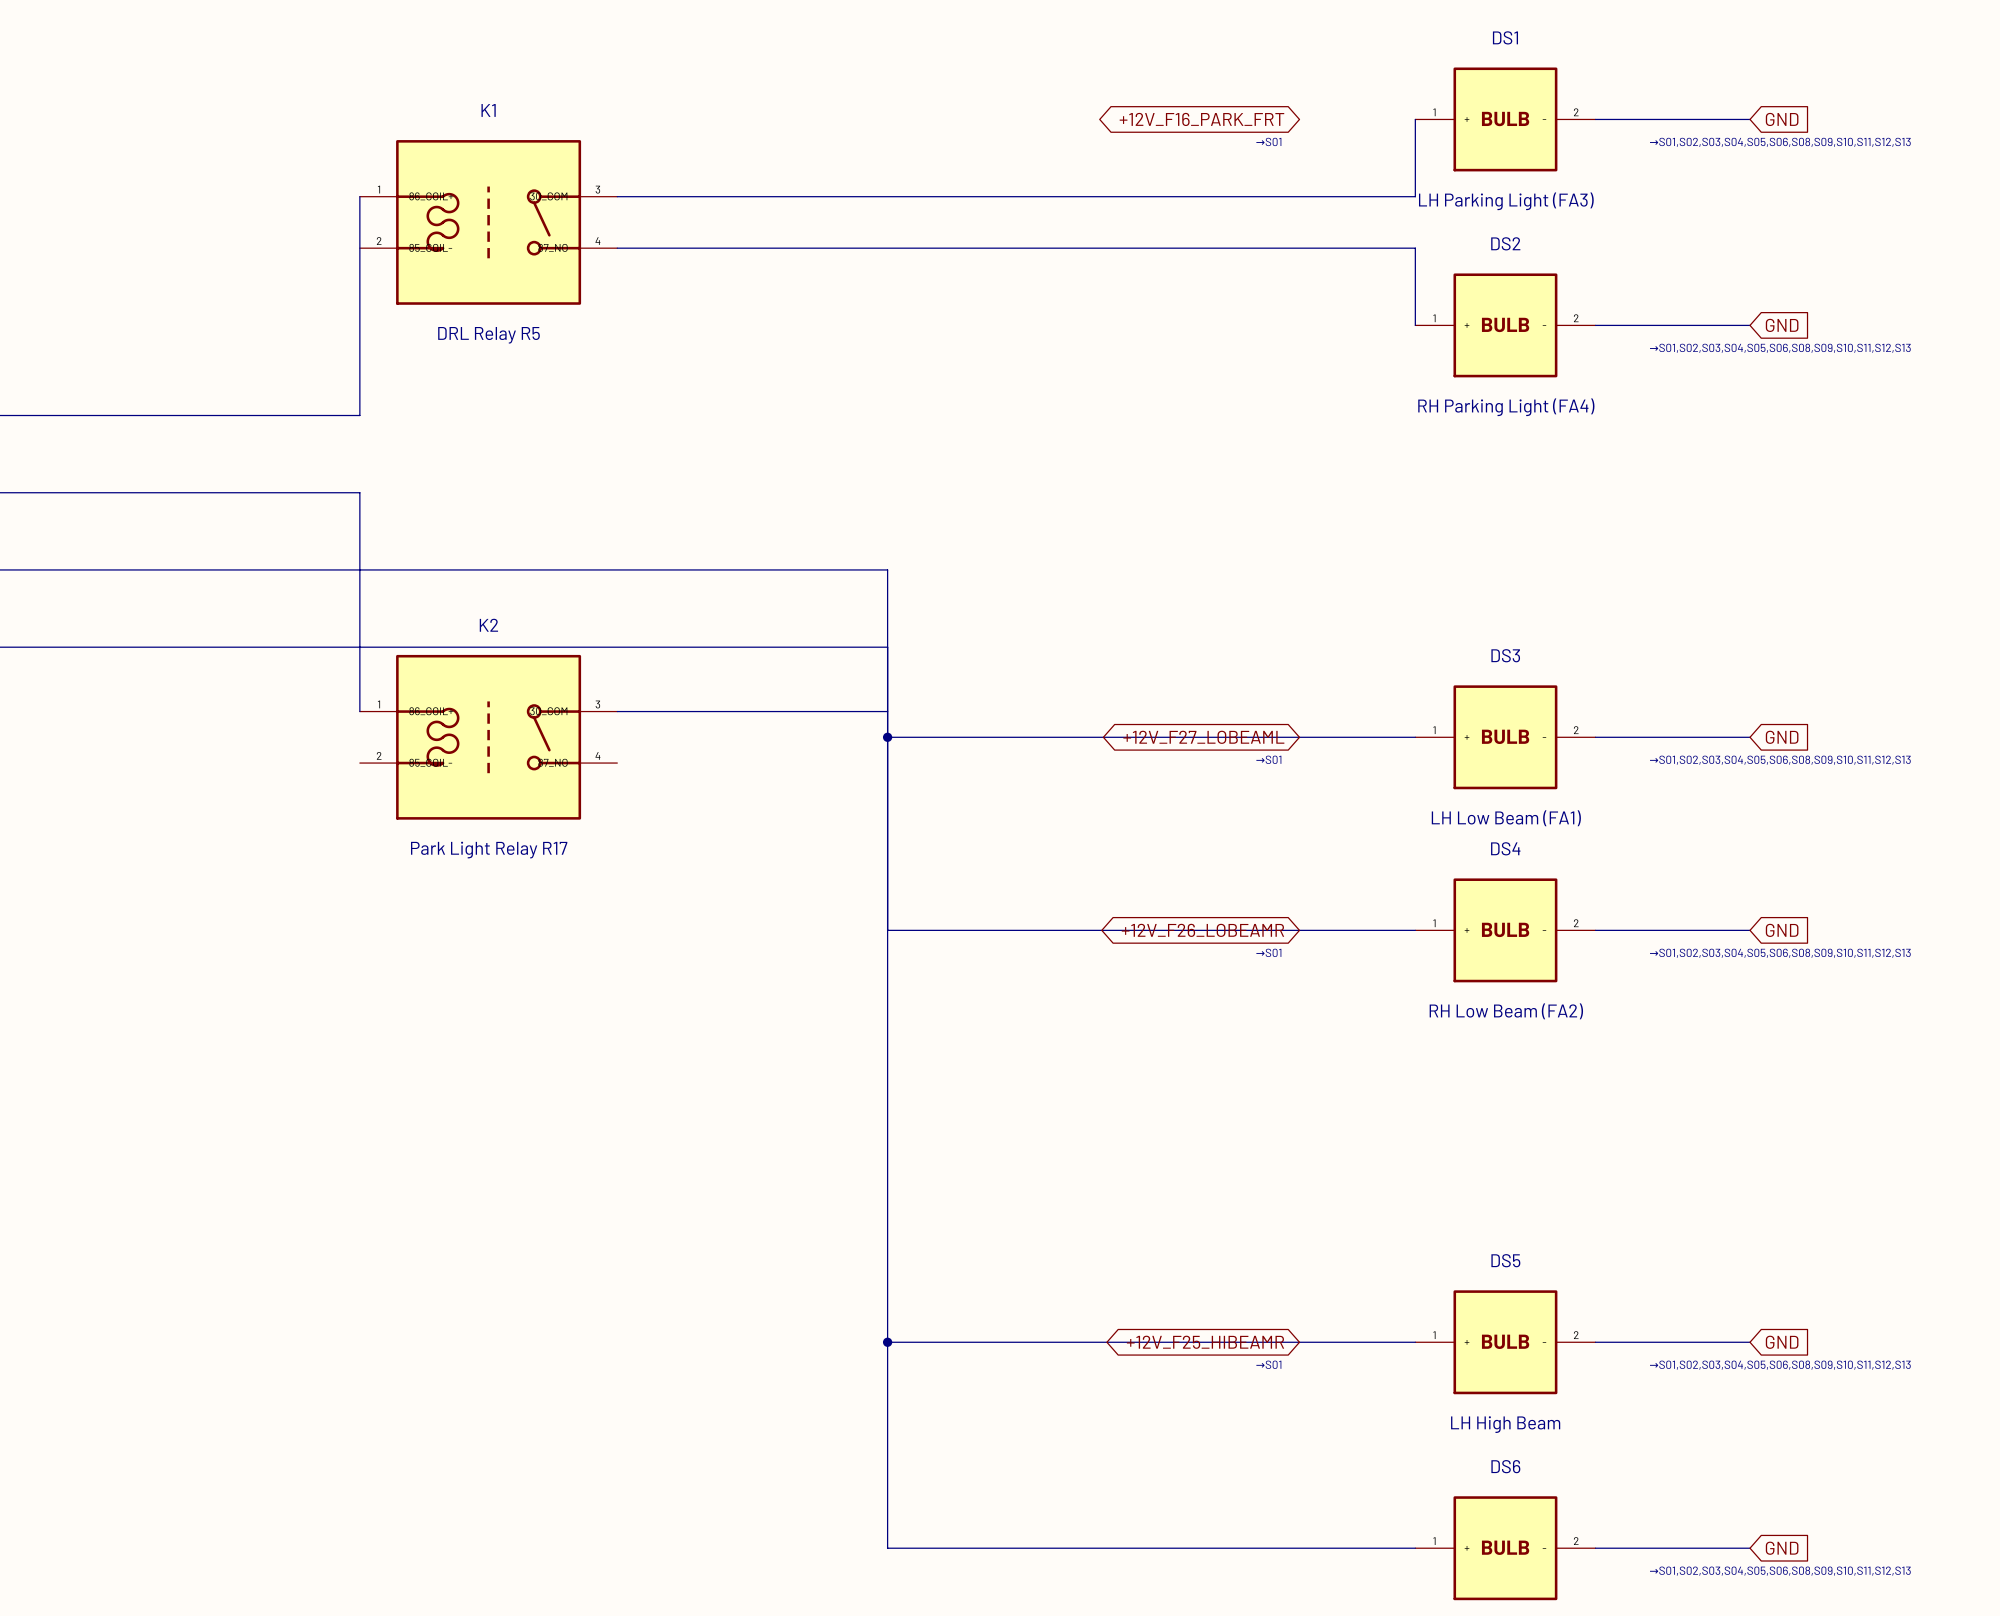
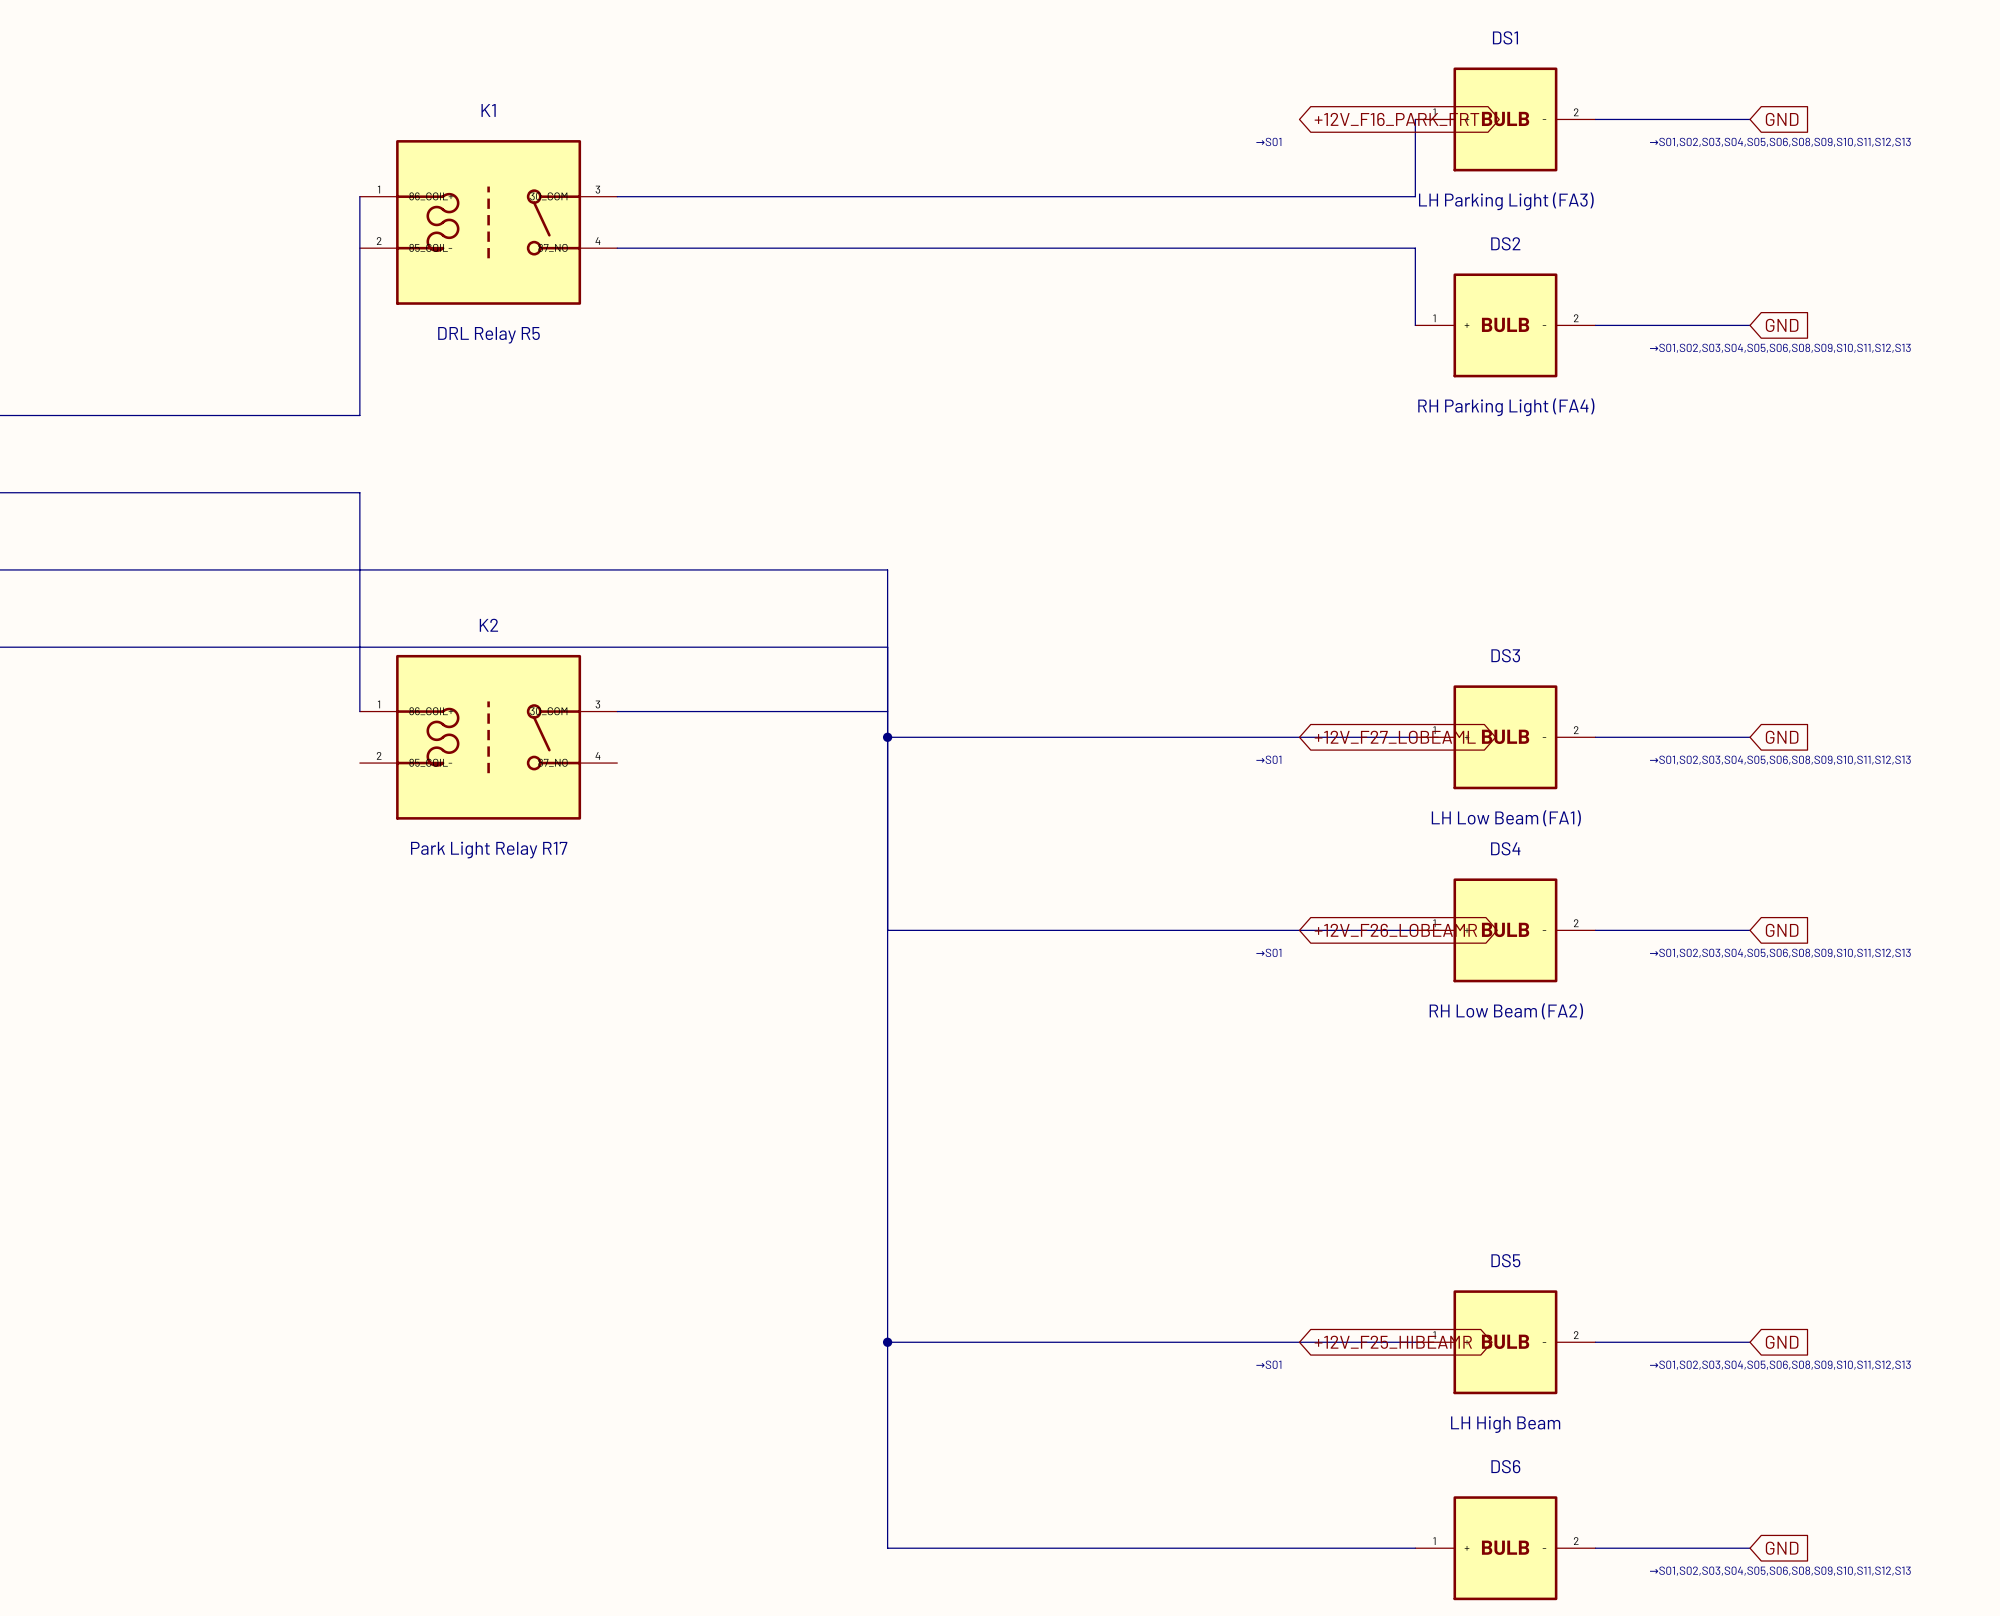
global label rotation: 0° (1201, 119) -> 180° (1396, 119)
global label position: +12V_F16_PARK_FRT (1201, 119) -> +12V_F16_PARK_FRT (1396, 119)
global label rotation: 0° (1203, 737) -> 180° (1395, 737)
global label rotation: 0° (1202, 930) -> 180° (1395, 930)
global label rotation: 0° (1205, 1342) -> 180° (1393, 1342)

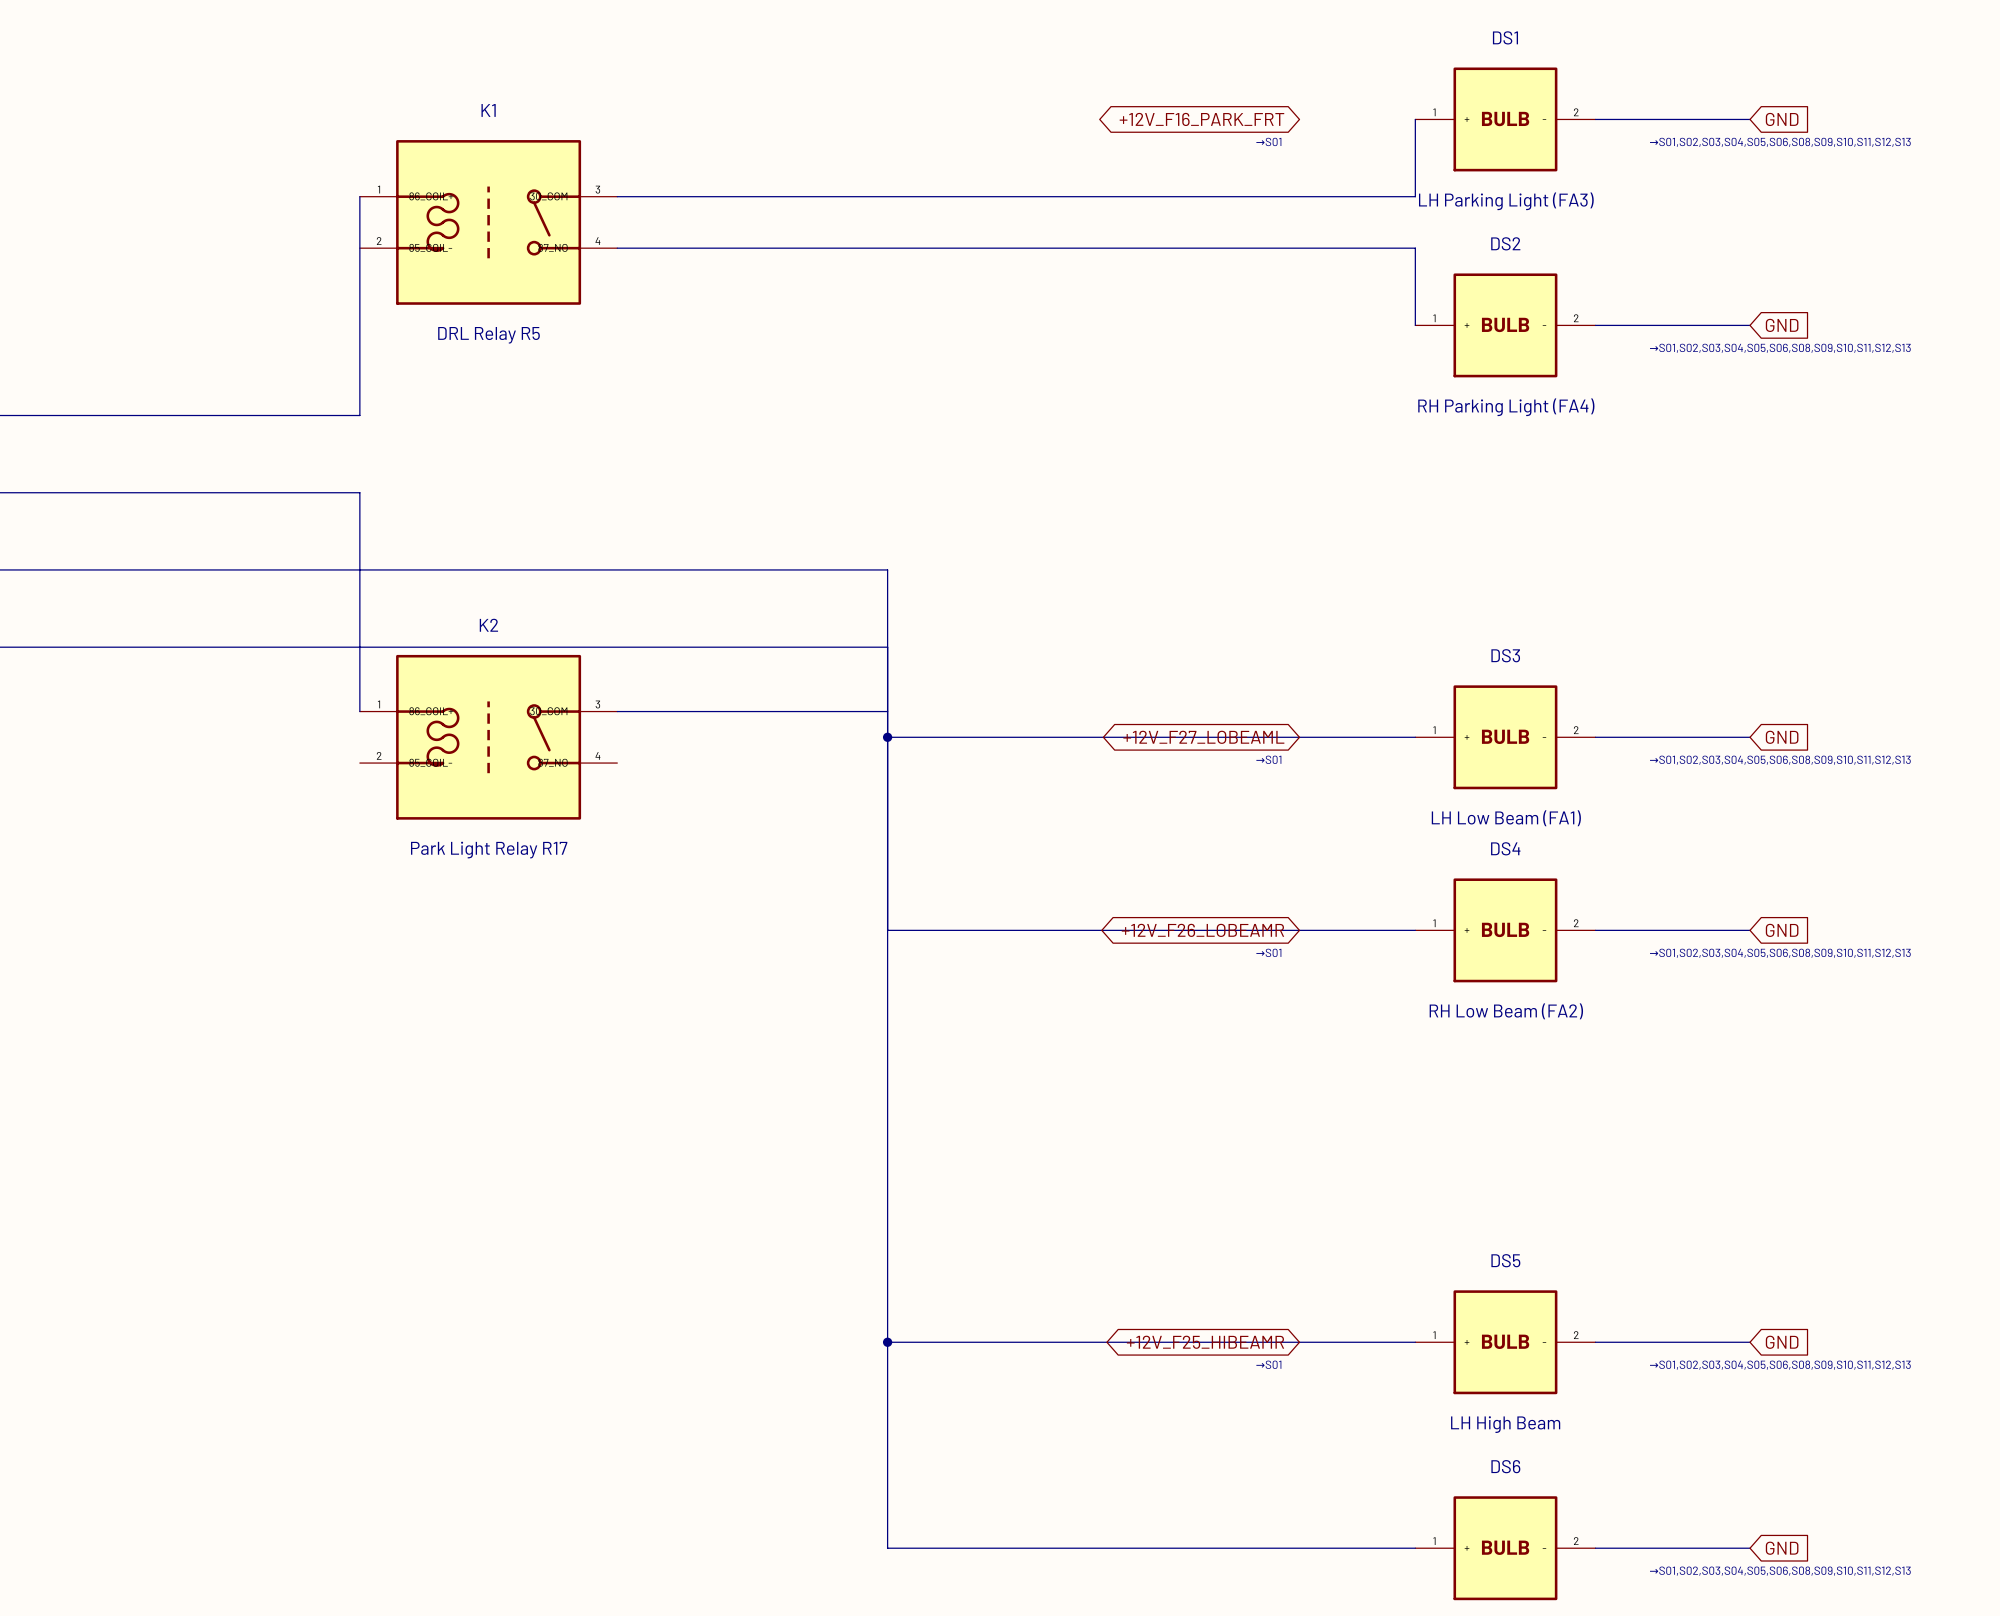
global label rotation: 0° (1396, 119) -> 180° (1201, 119)
global label rotation: 0° (1395, 737) -> 180° (1203, 737)
global label rotation: 0° (1395, 930) -> 180° (1202, 930)
global label position: +12V_F26_LOBEAMR (1395, 930) -> +12V_F26_LOBEAMR (1202, 930)
global label rotation: 0° (1393, 1342) -> 180° (1205, 1342)

